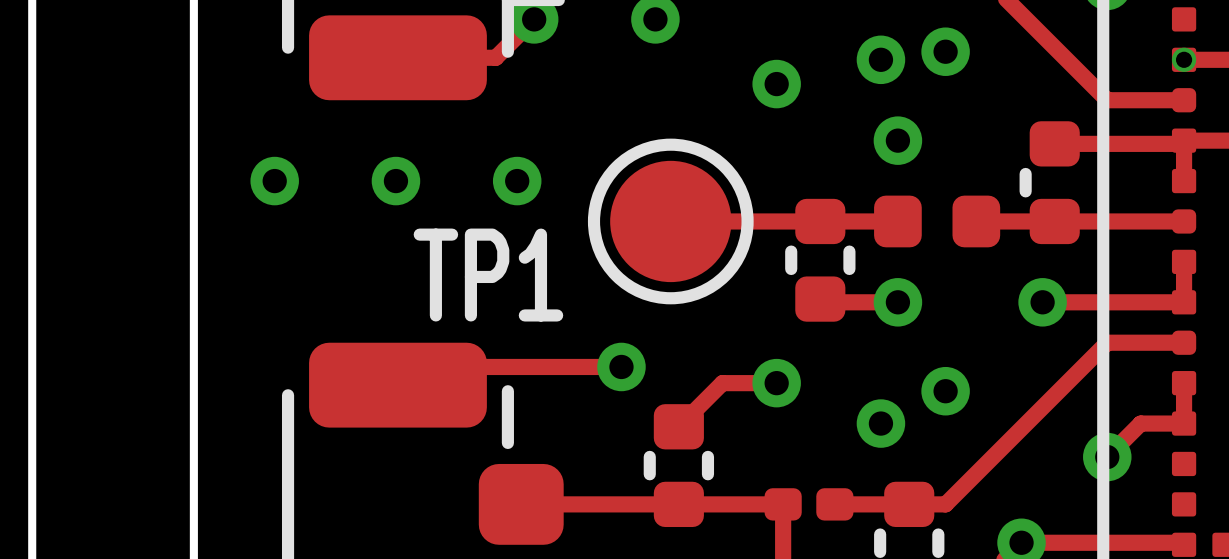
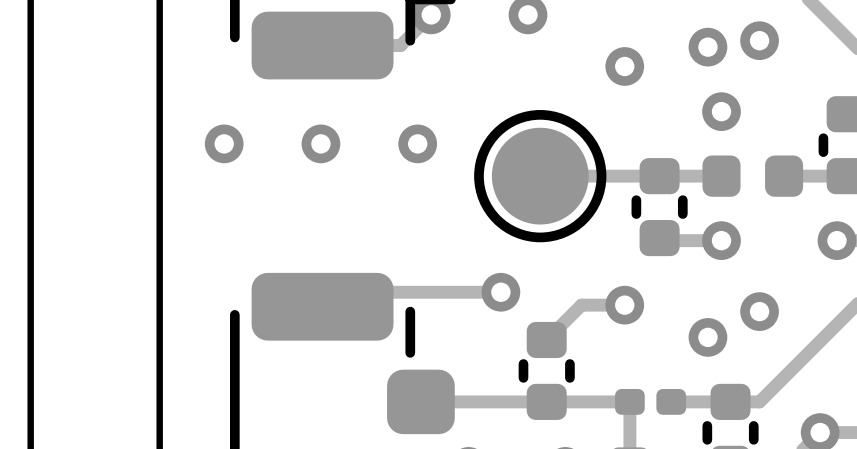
TP1 name: TP1 (488, 275) -> none

